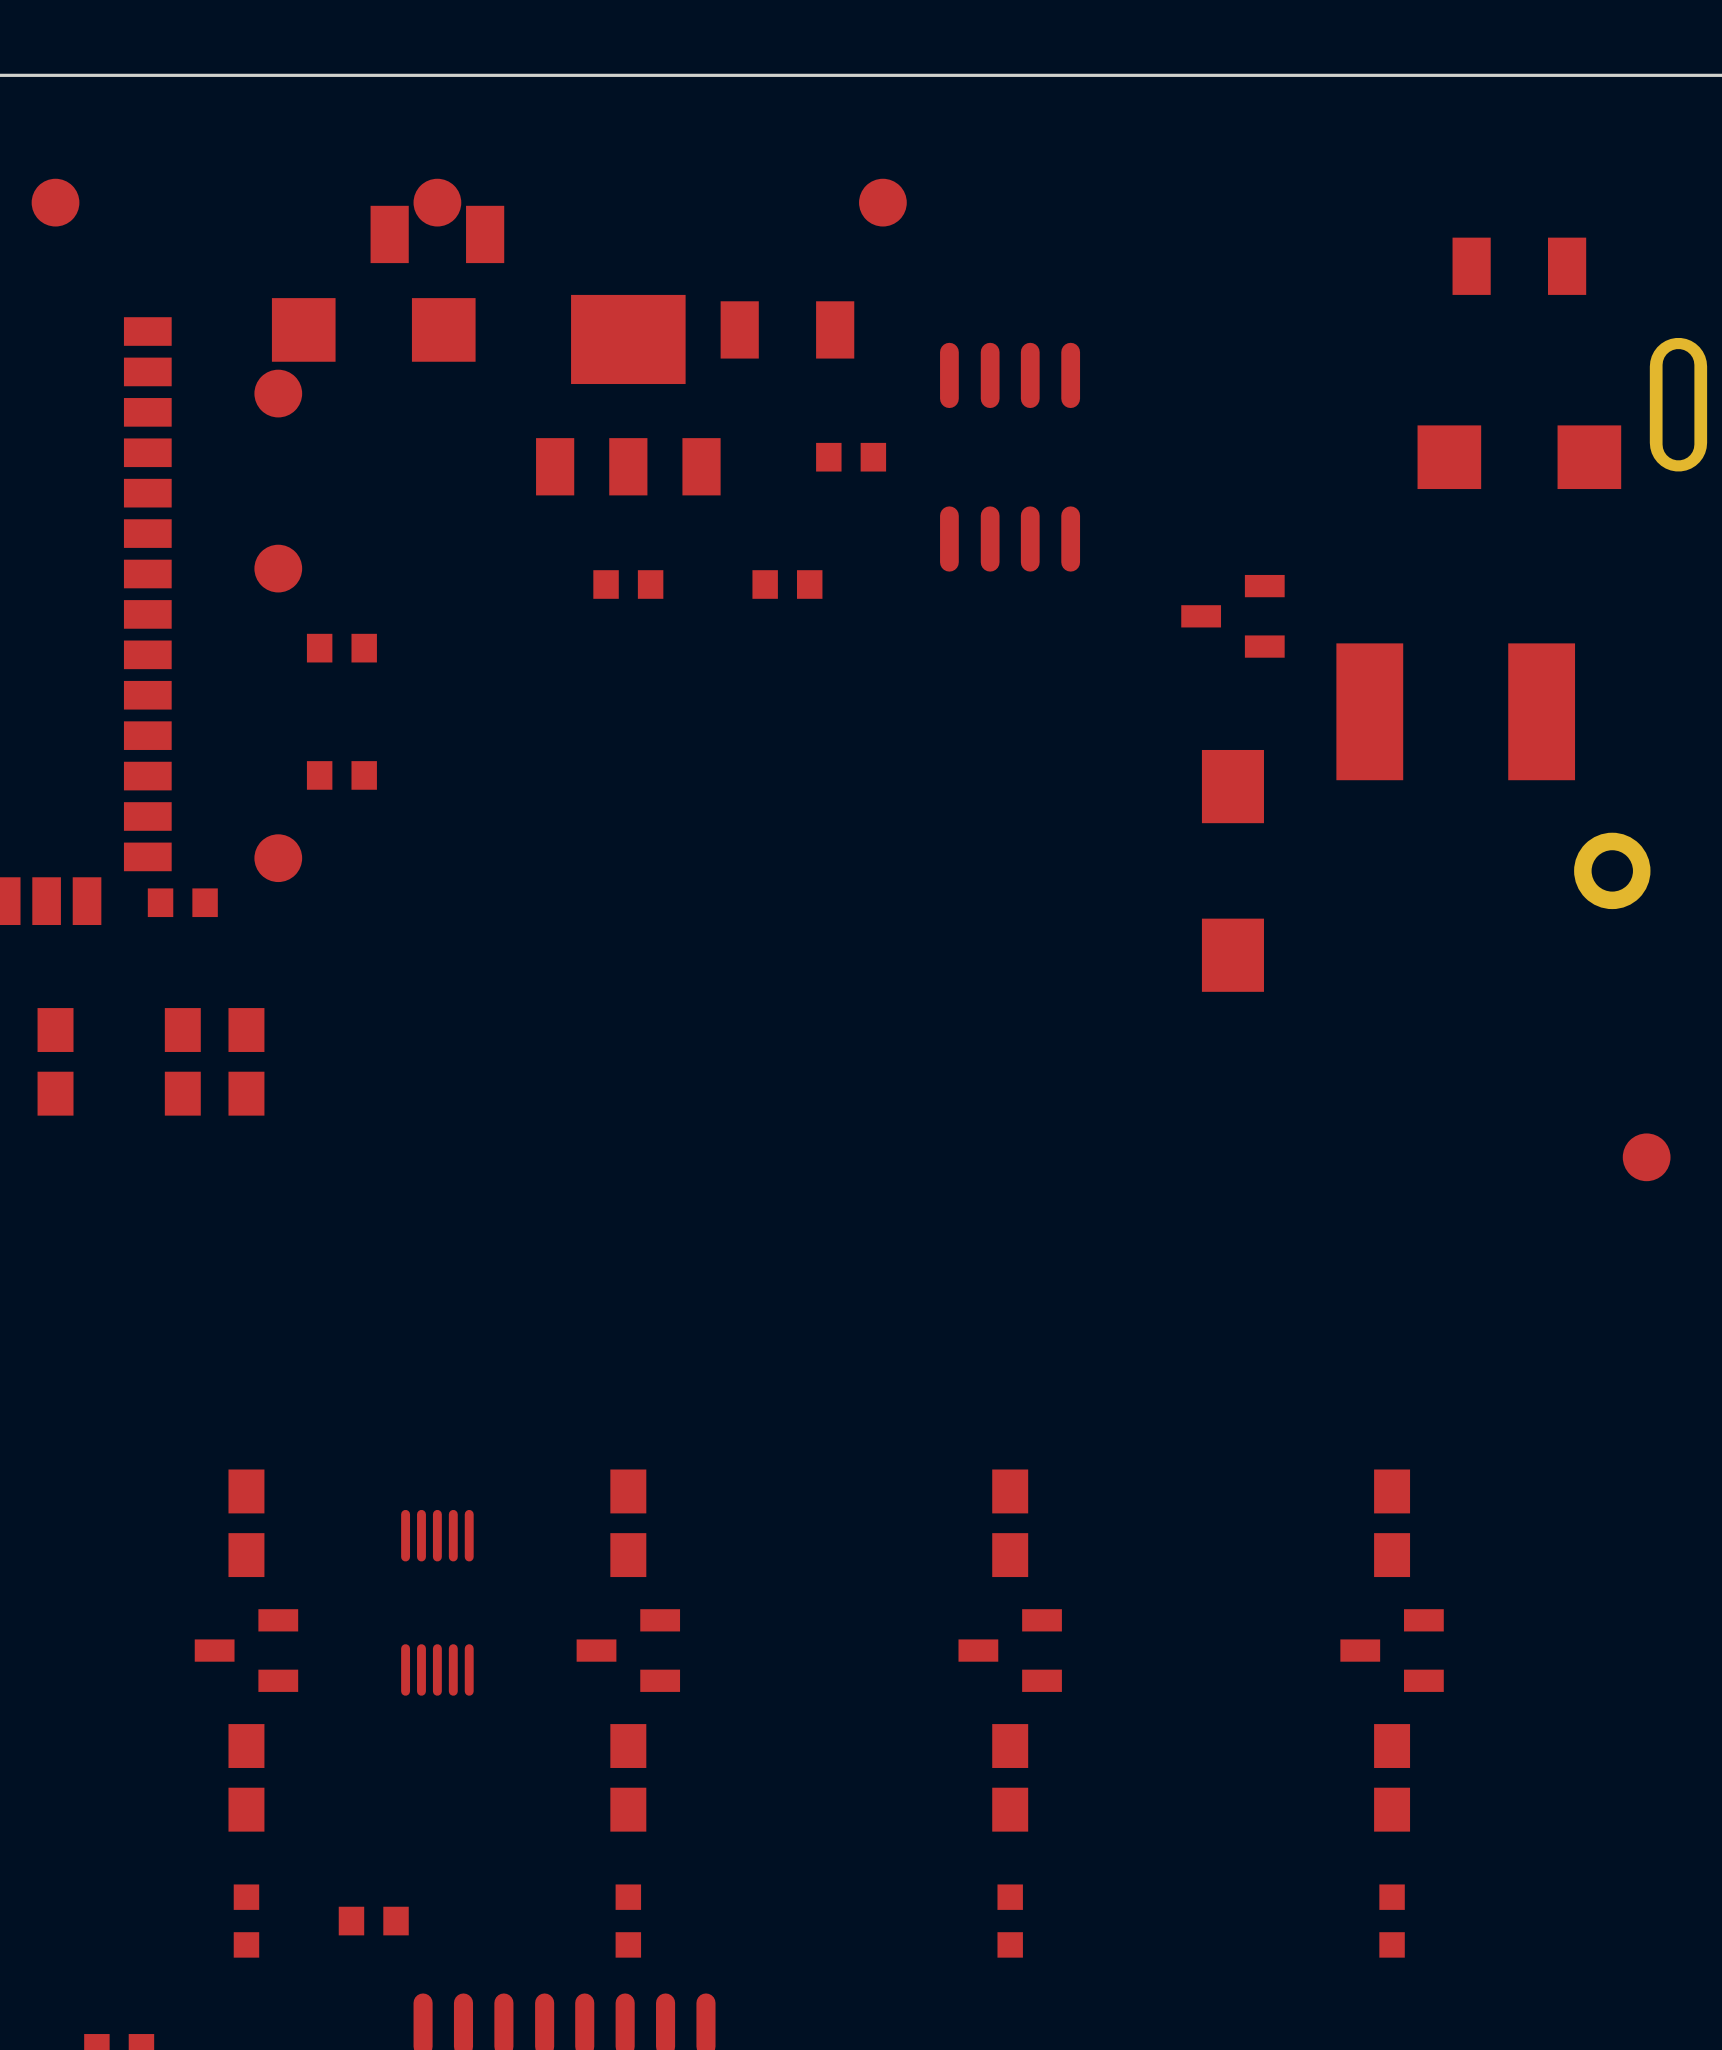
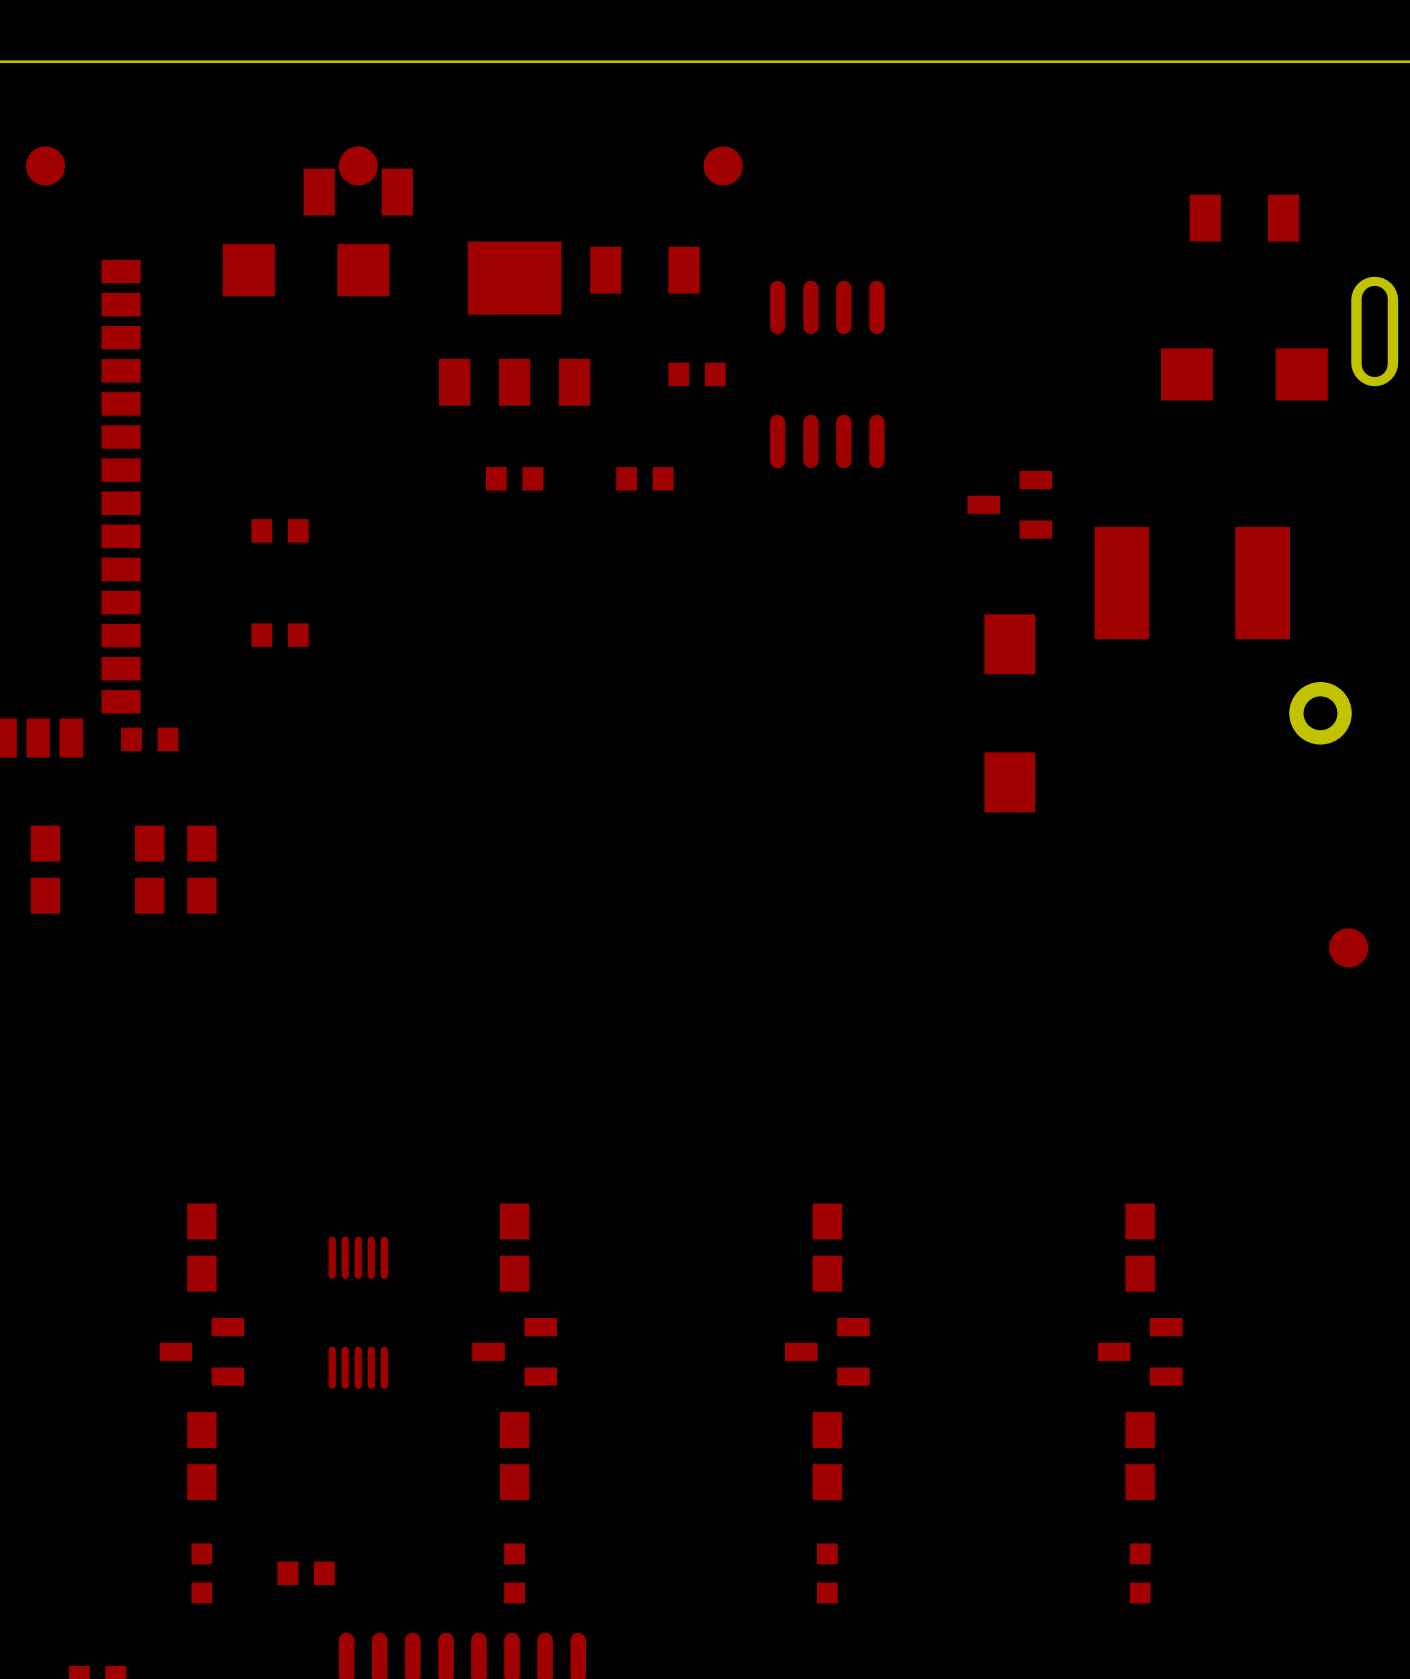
part: (278, 393) -> none
part: (278, 568) -> none
part: (278, 858) -> none

